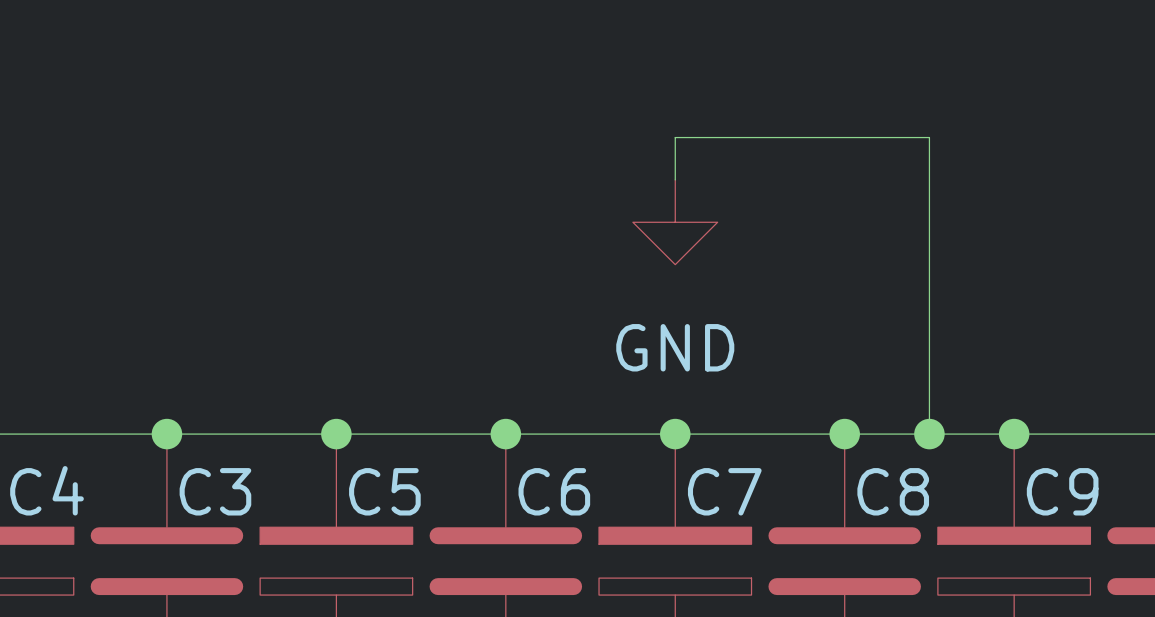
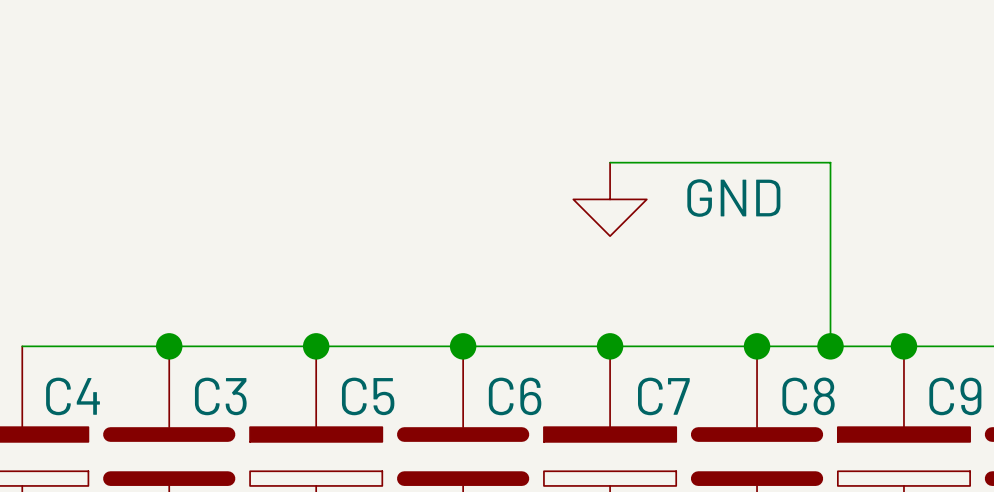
wire: (675, 179) (675, 137) (929, 137) (929, 222) -> (610, 162) (830, 162)
power symbol position: GND (675, 222) -> GND (610, 199)
power symbol text position: GND (675, 347) -> GND (733, 198)

